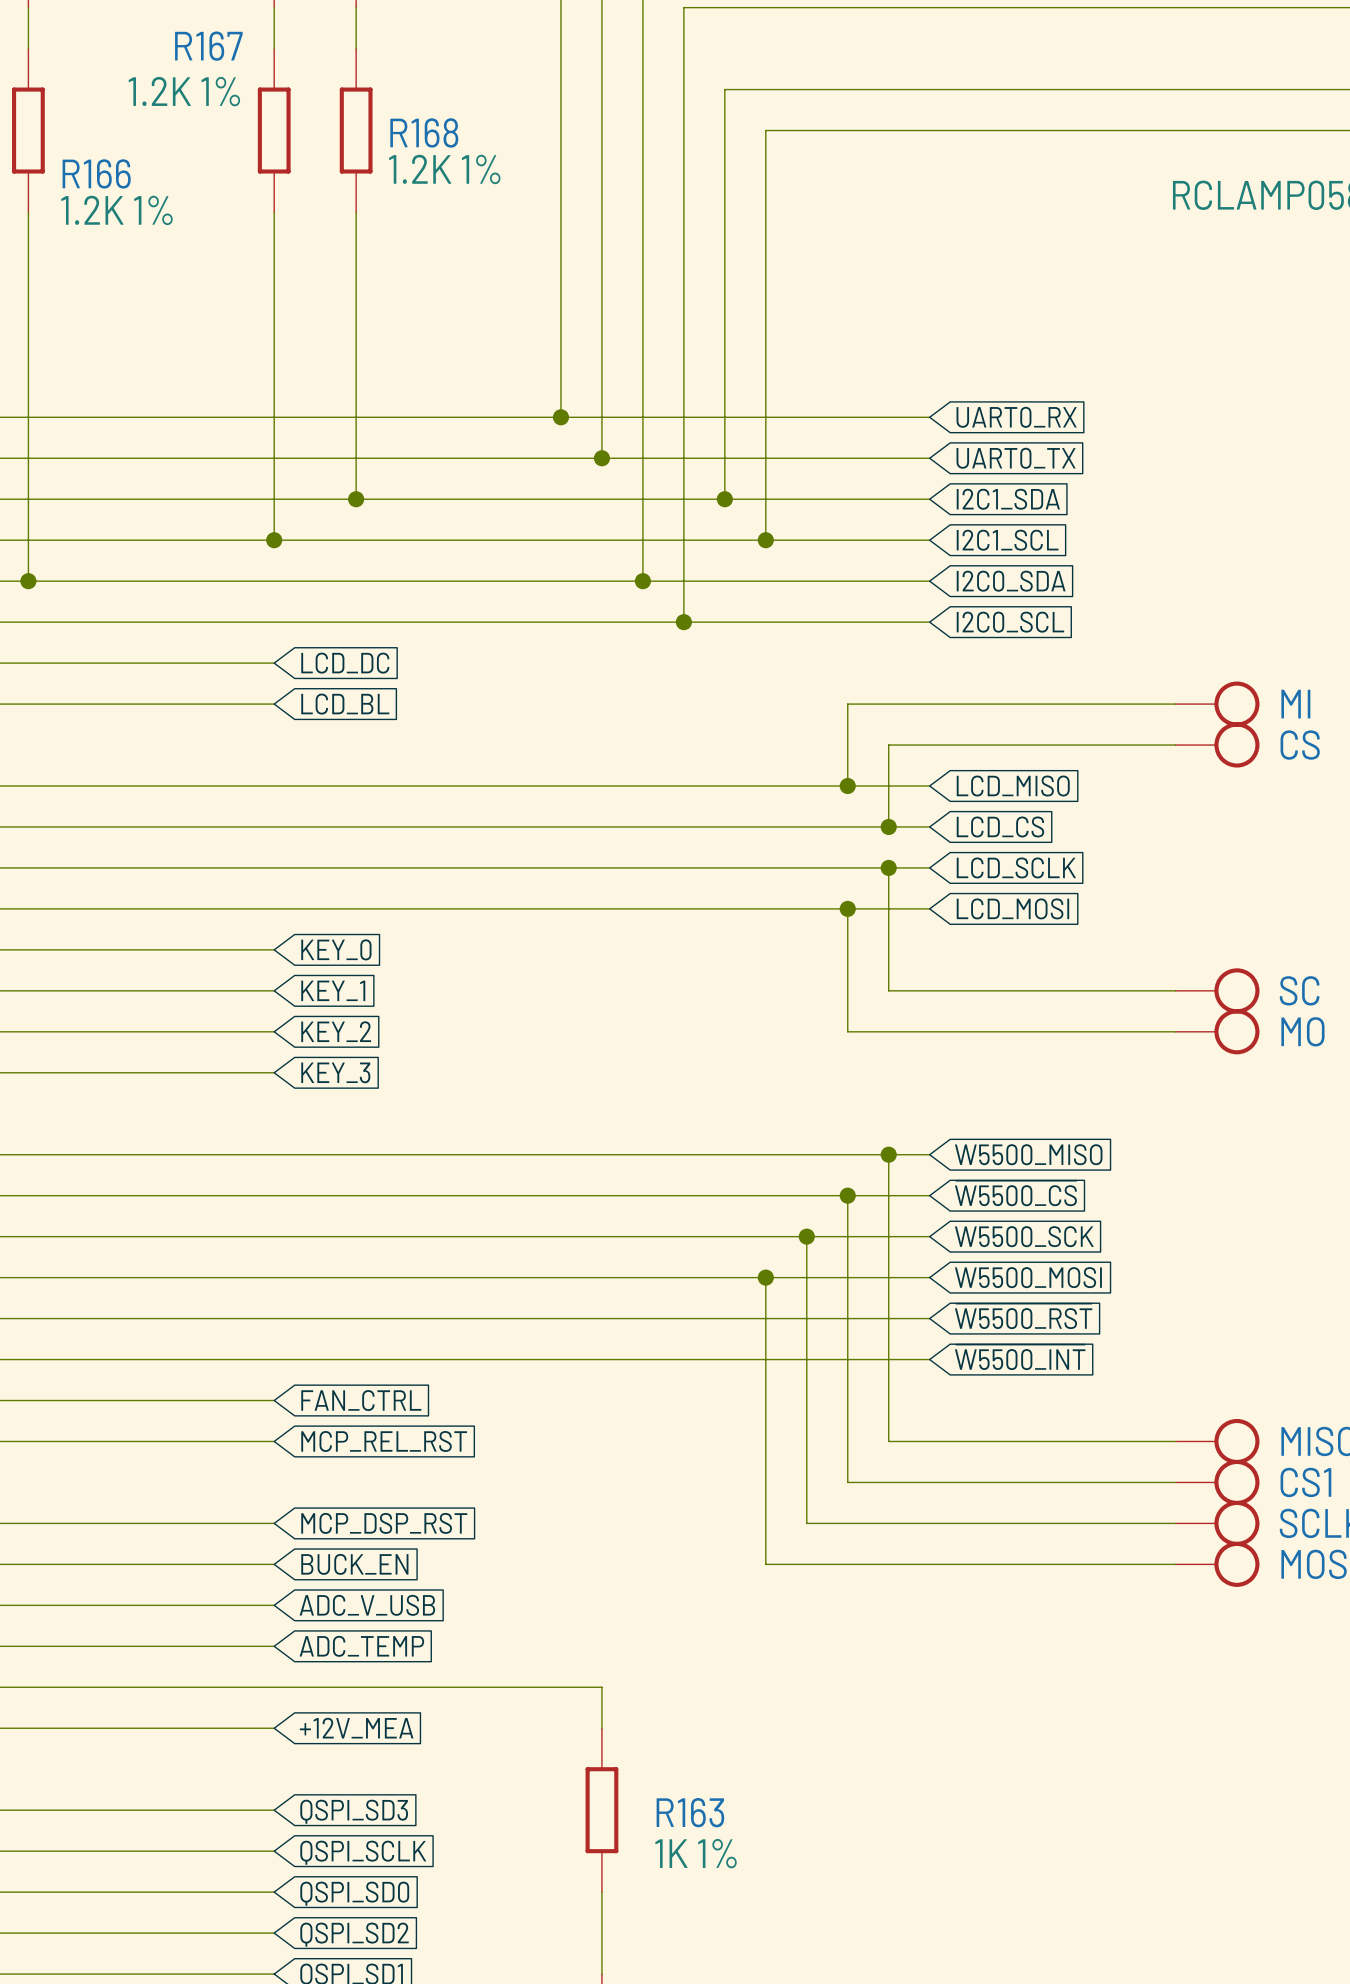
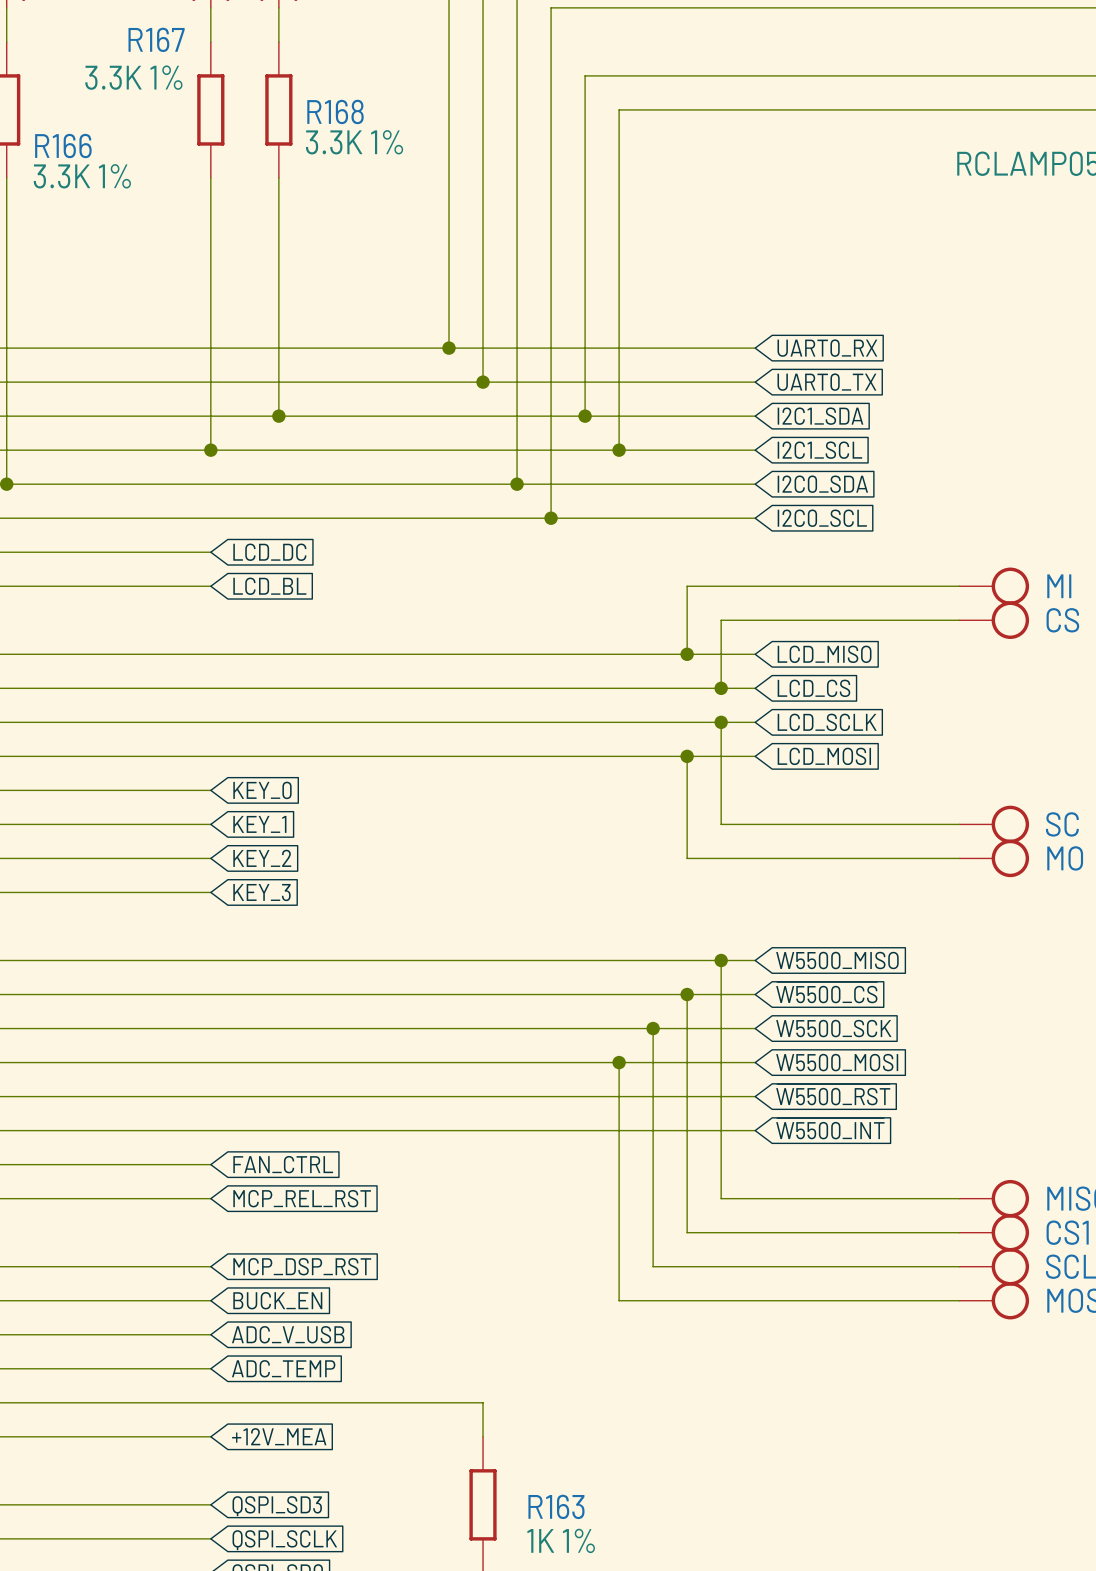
R167 value: 1.2K 1% (184, 91) -> 3.3K 1% (133, 77)
R168 value: 1.2K 1% (444, 169) -> 3.3K 1% (354, 142)
R166 value: 1.2K 1% (117, 210) -> 3.3K 1% (82, 176)

